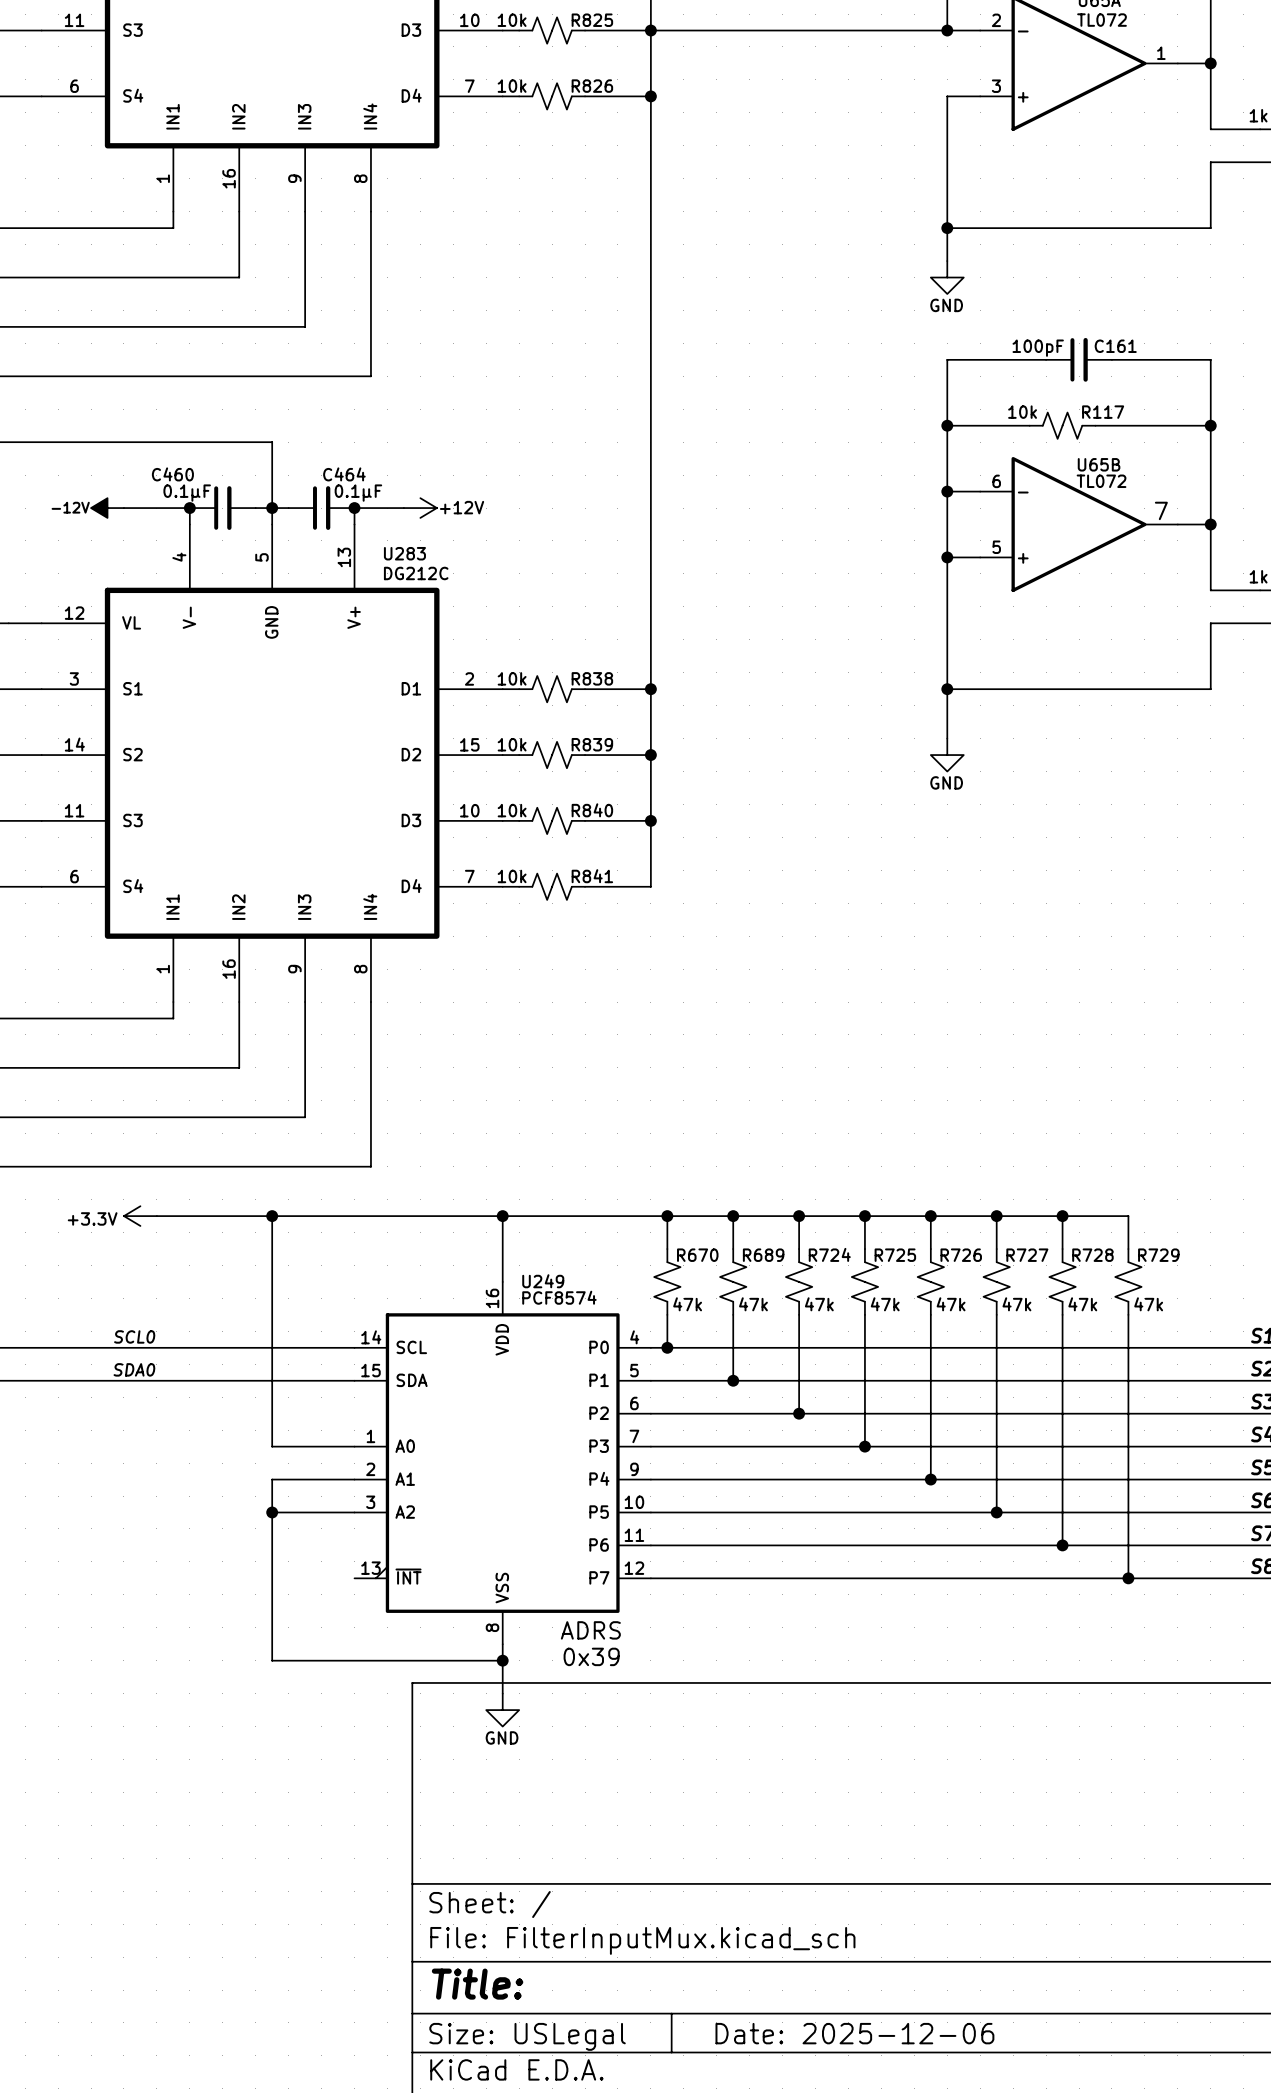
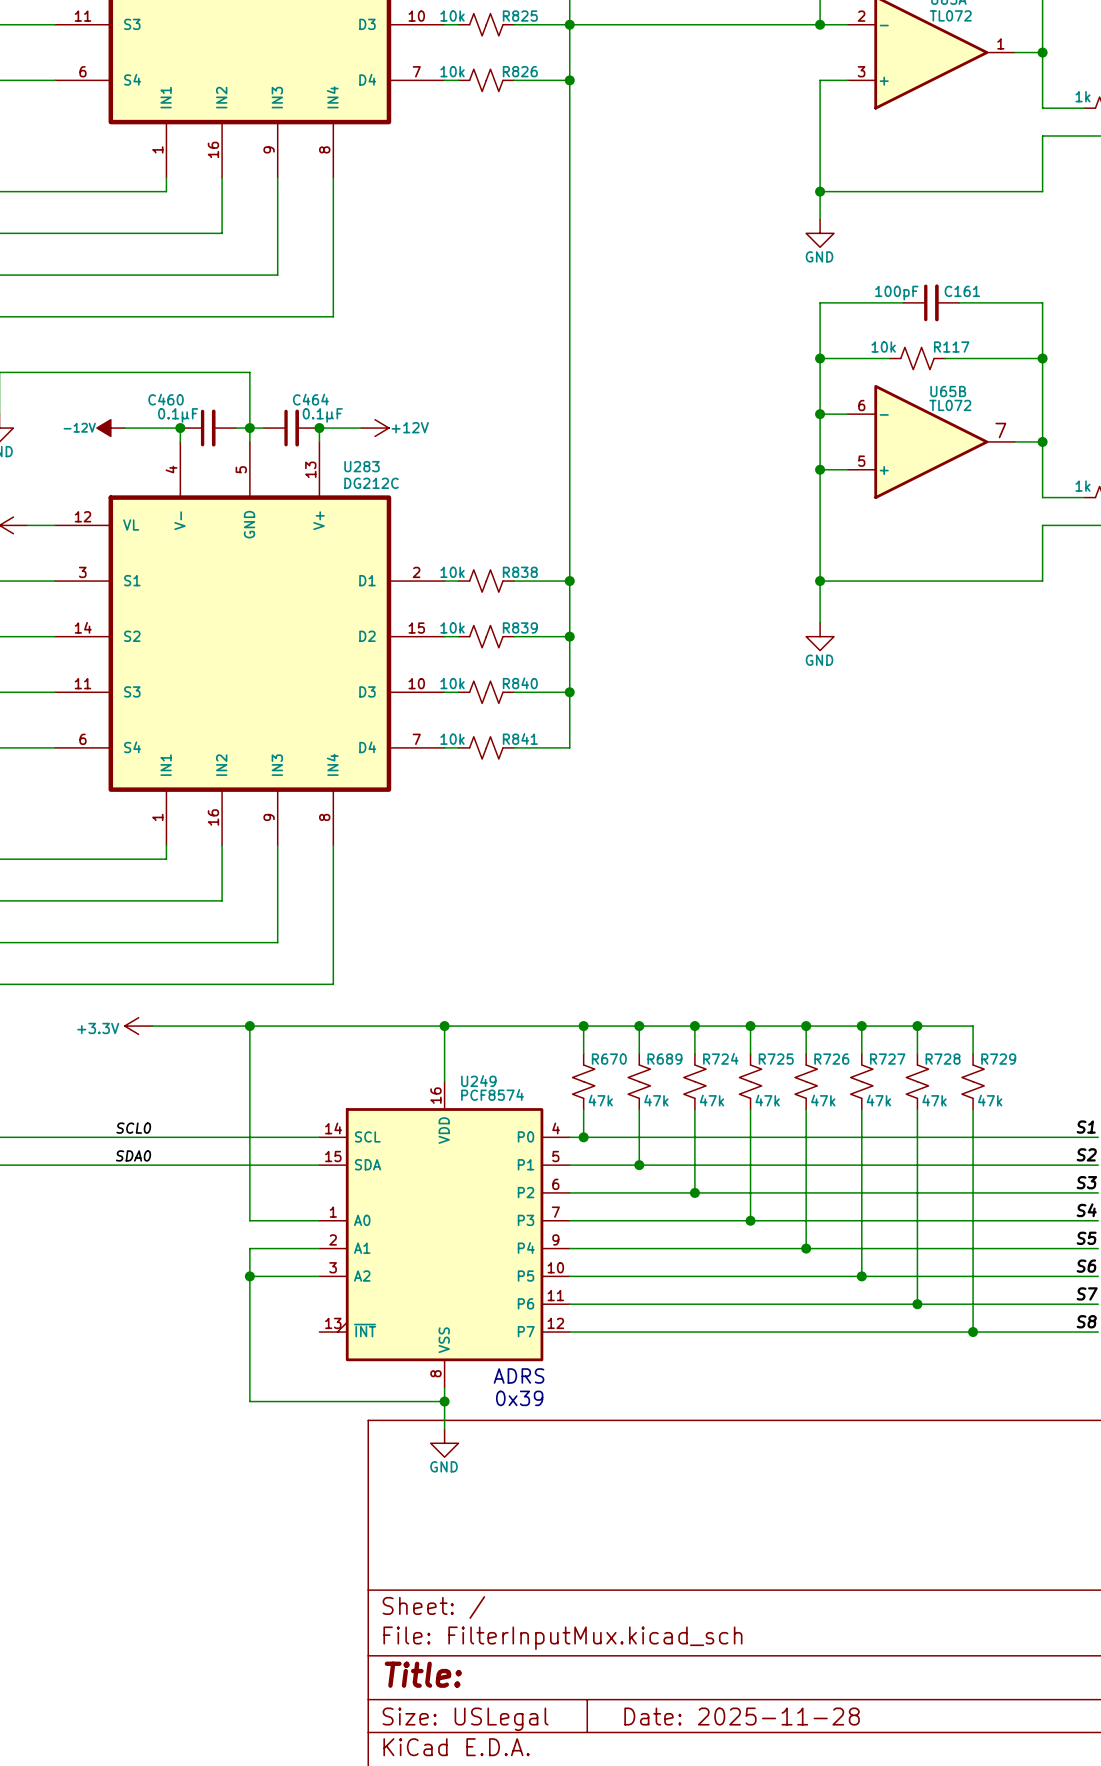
title block: Date: 2025-12-06 (854, 2033) -> Date: 2025-11-28 (742, 1716)

